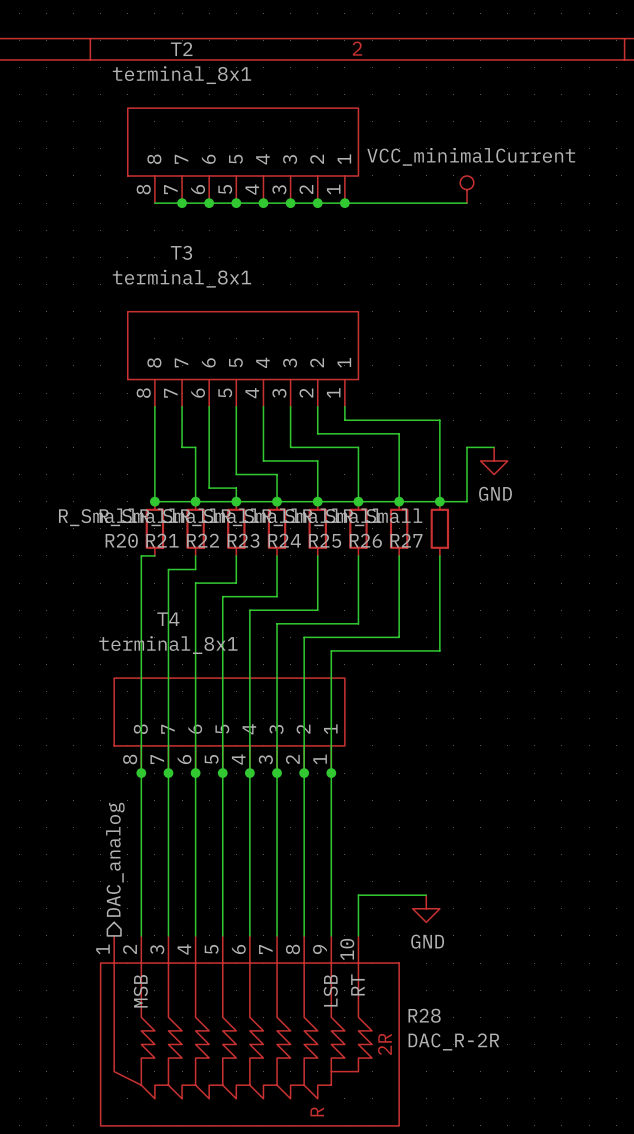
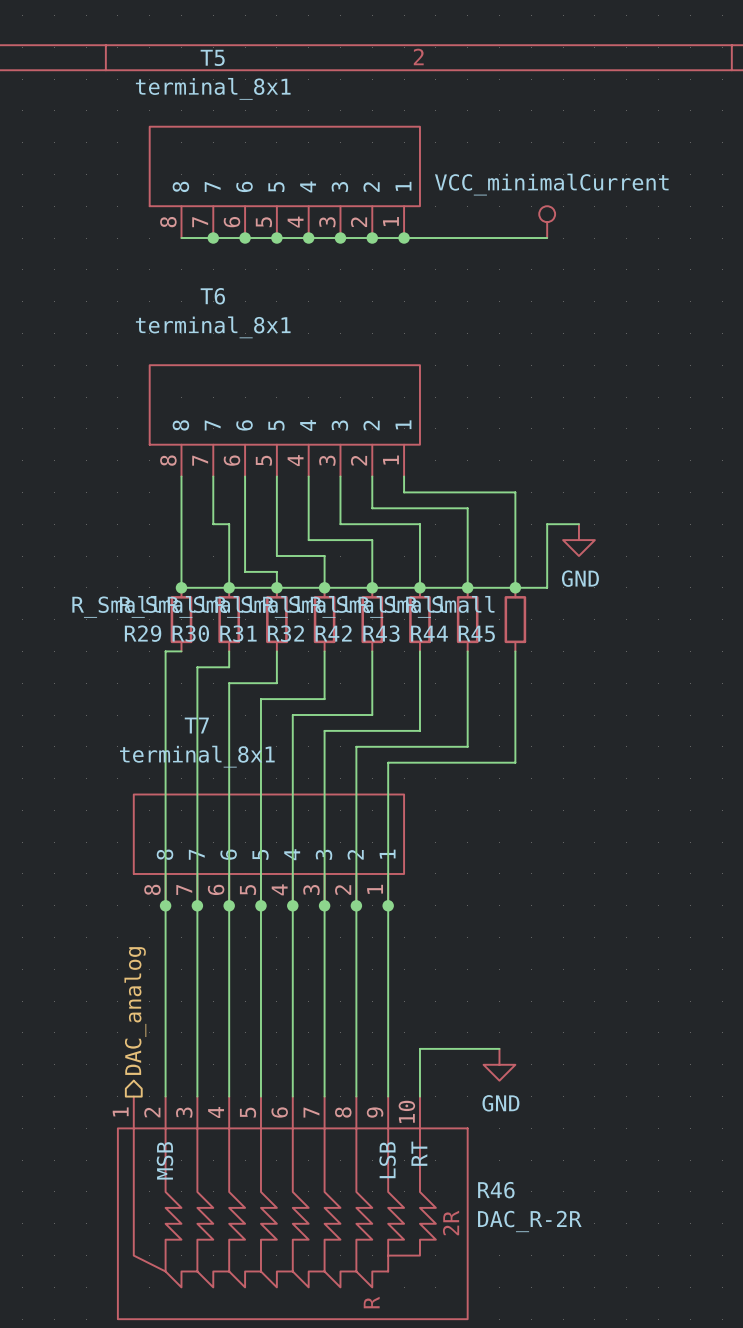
T2 name: T2 (181, 49) -> T5 (212, 57)
T3 name: T3 (181, 252) -> T6 (212, 296)
R20 name: R20 (121, 540) -> R29 (143, 633)
R21 name: R21 (162, 540) -> R30 (190, 633)
R22 name: R22 (203, 540) -> R31 (238, 633)
R23 name: R23 (243, 540) -> R32 (285, 633)
R24 name: R24 (284, 540) -> R42 (333, 633)
R25 name: R25 (325, 540) -> R43 (381, 633)
R26 name: R26 (365, 540) -> R44 (429, 633)
R27 name: R27 (406, 540) -> R45 (476, 633)
T4 name: T4 (168, 619) -> T7 (196, 725)
R28 name: R28 (424, 1015) -> R46 (496, 1190)

